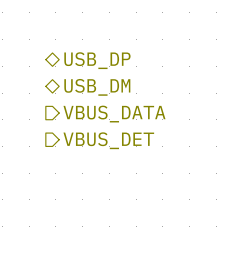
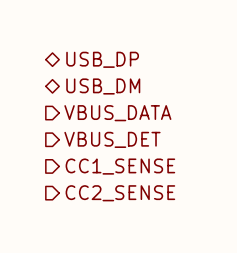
hierarchical label: none -> CC1_SENSE (120, 166)
hierarchical label: none -> CC2_SENSE (120, 193)

